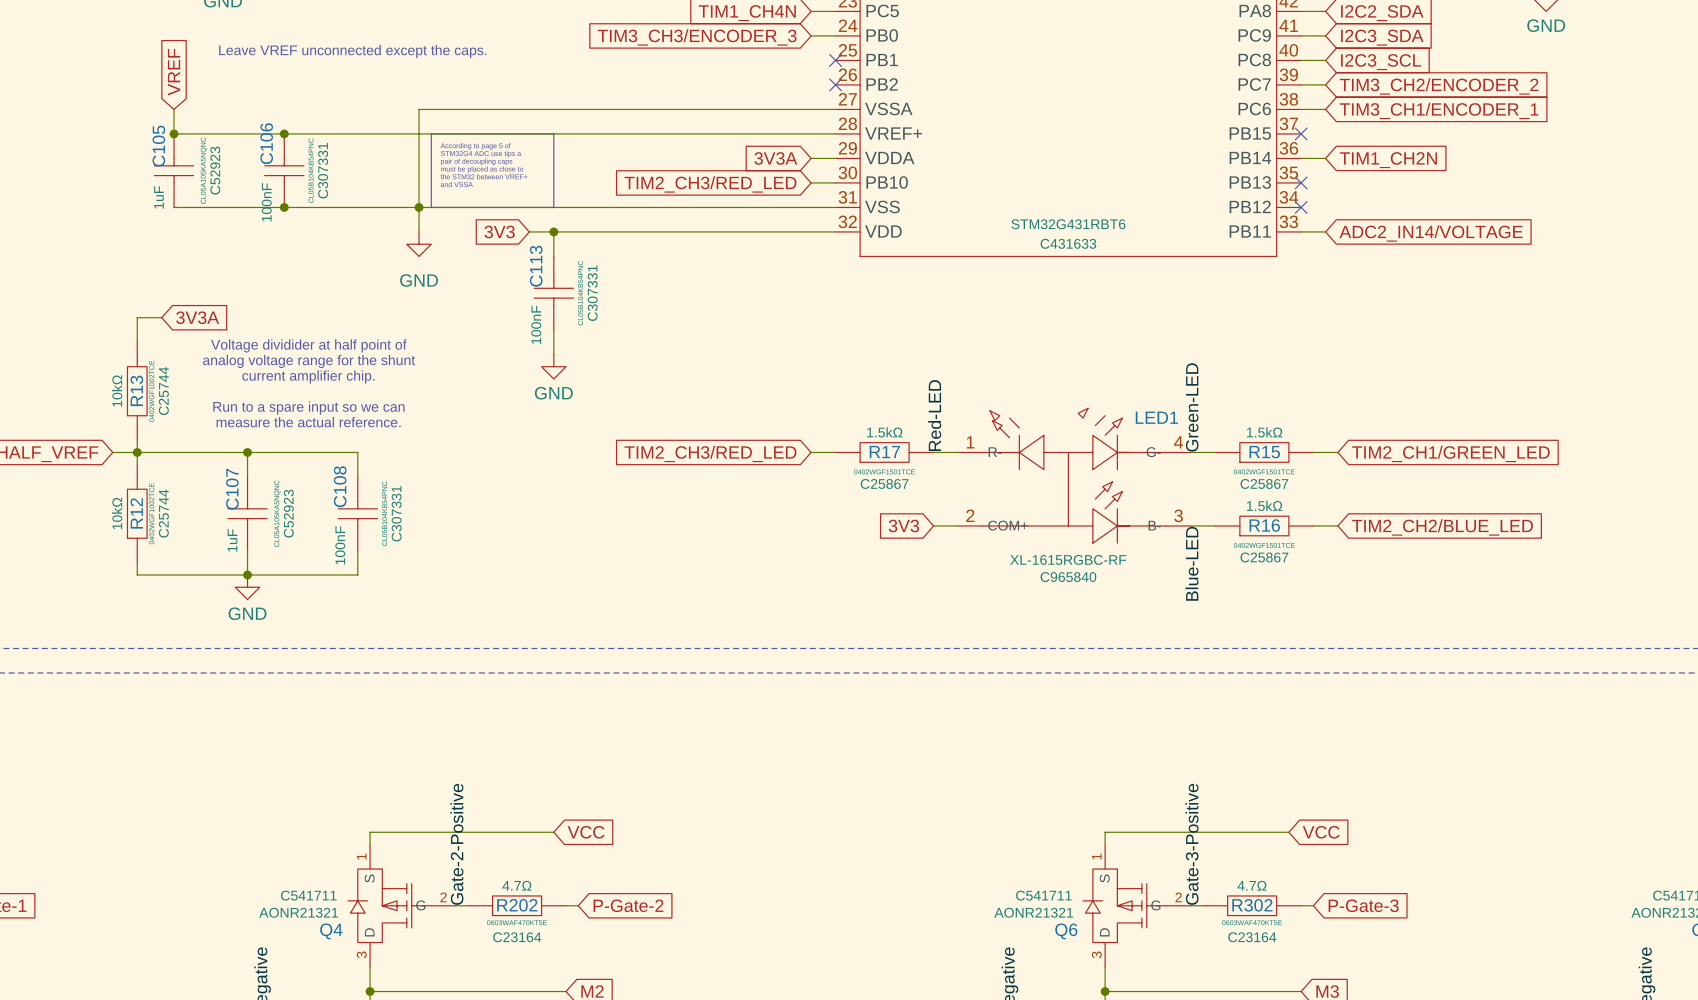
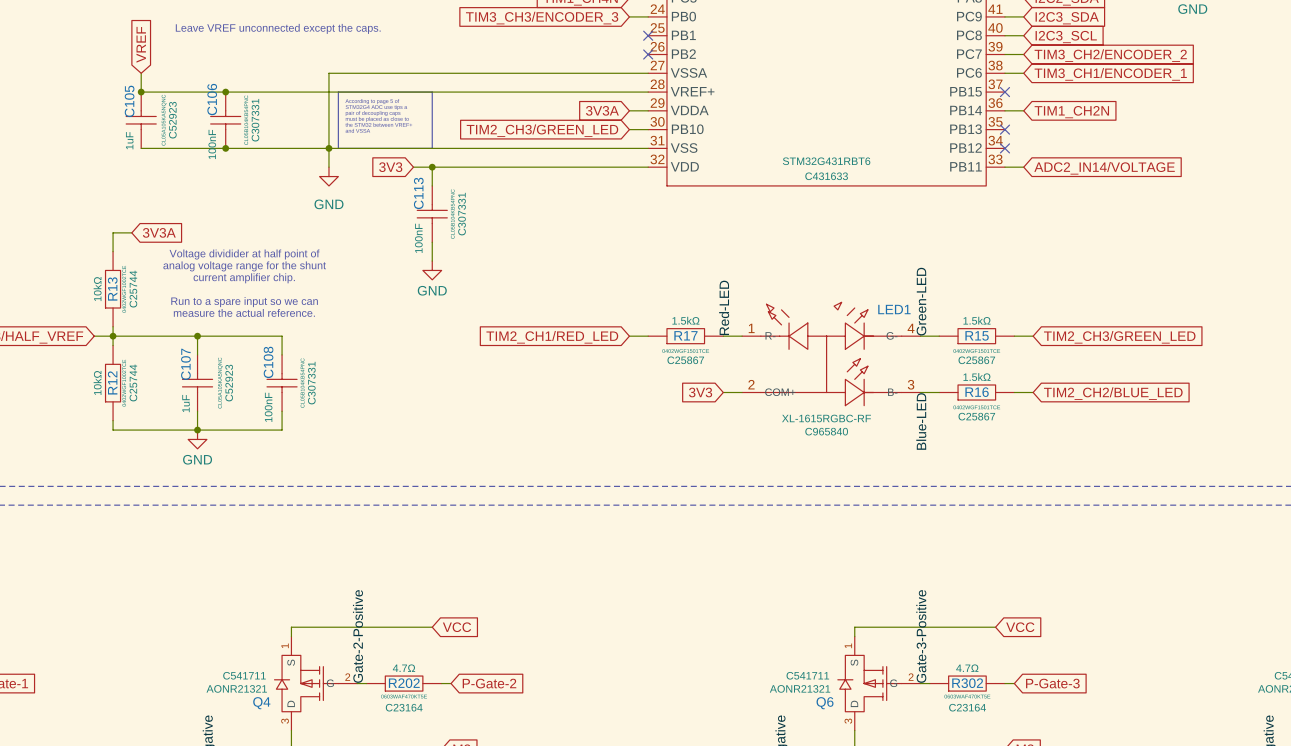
global label: TIM2_CH3/RED_LED (710, 184) -> TIM2_CH3/GREEN_LED (542, 130)
global label: TIM2_CH3/RED_LED (710, 453) -> TIM2_CH1/RED_LED (552, 337)
global label: TIM2_CH1/GREEN_LED (1450, 453) -> TIM2_CH3/GREEN_LED (1119, 337)

